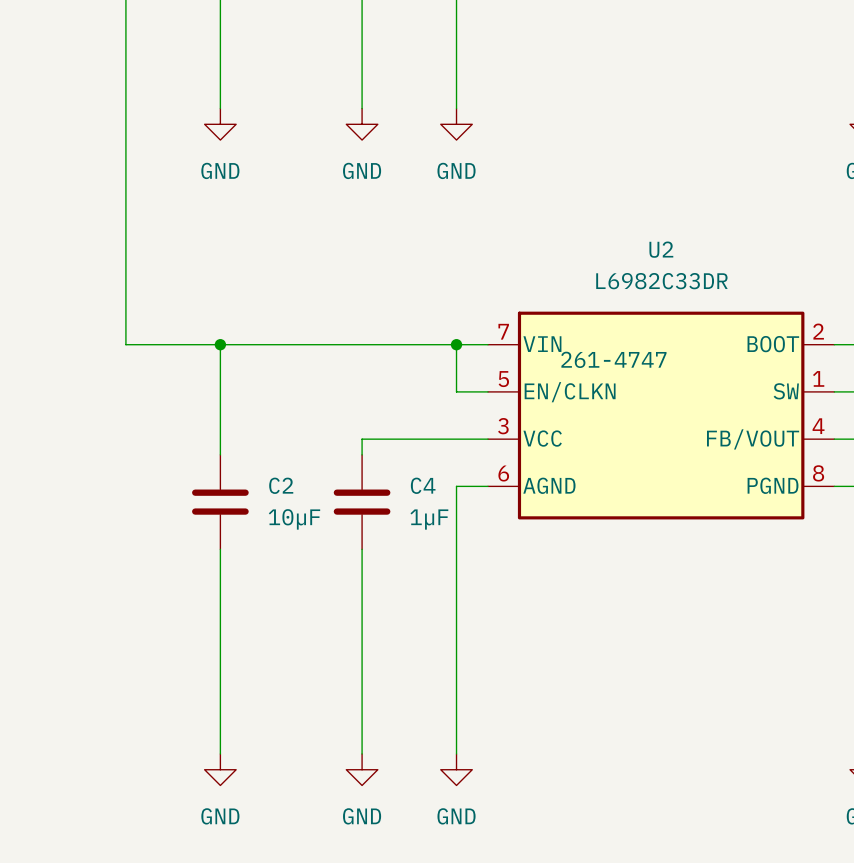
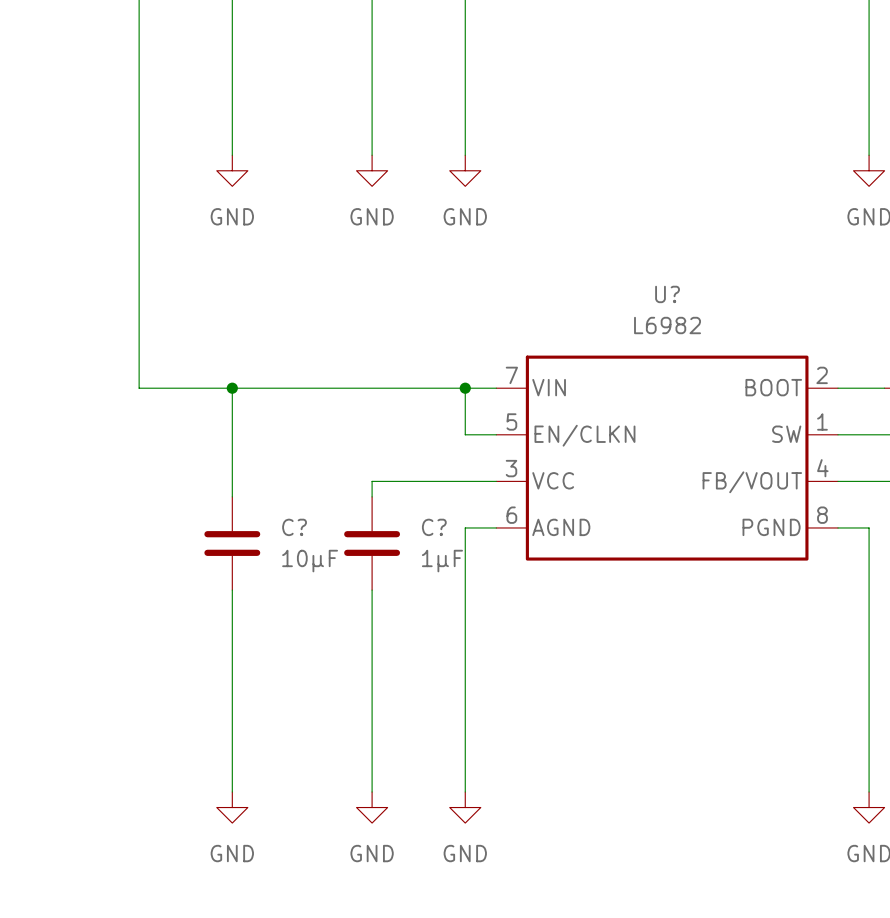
U2 name: U2 (661, 249) -> U? (667, 294)
U2 value: L6982C33DR (661, 281) -> L6982 (667, 325)
U2 text: 261-4747 (613, 359) -> none
C2 name: C2 (281, 485) -> C? (294, 527)
C4 name: C4 (423, 485) -> C? (434, 527)

